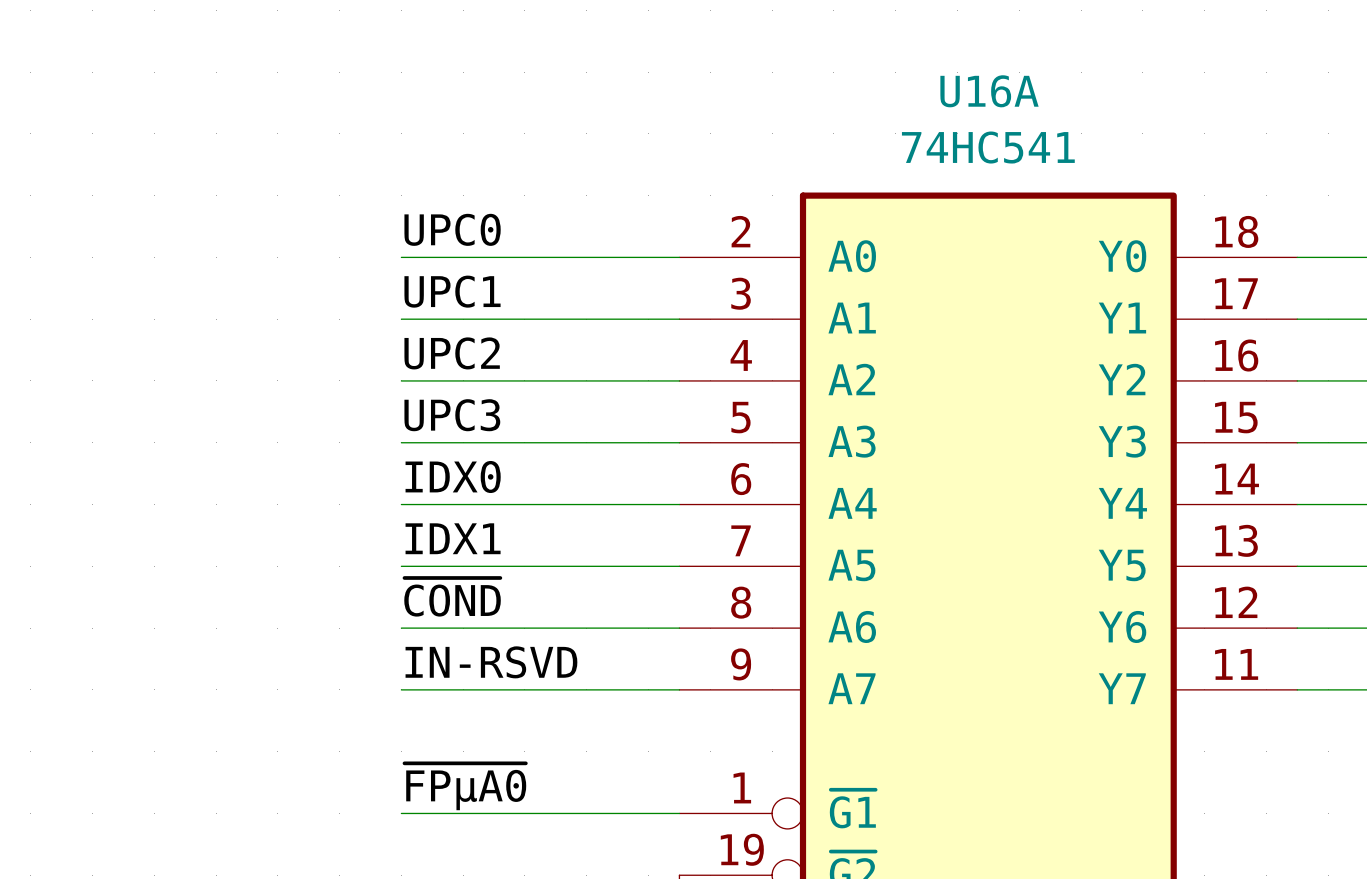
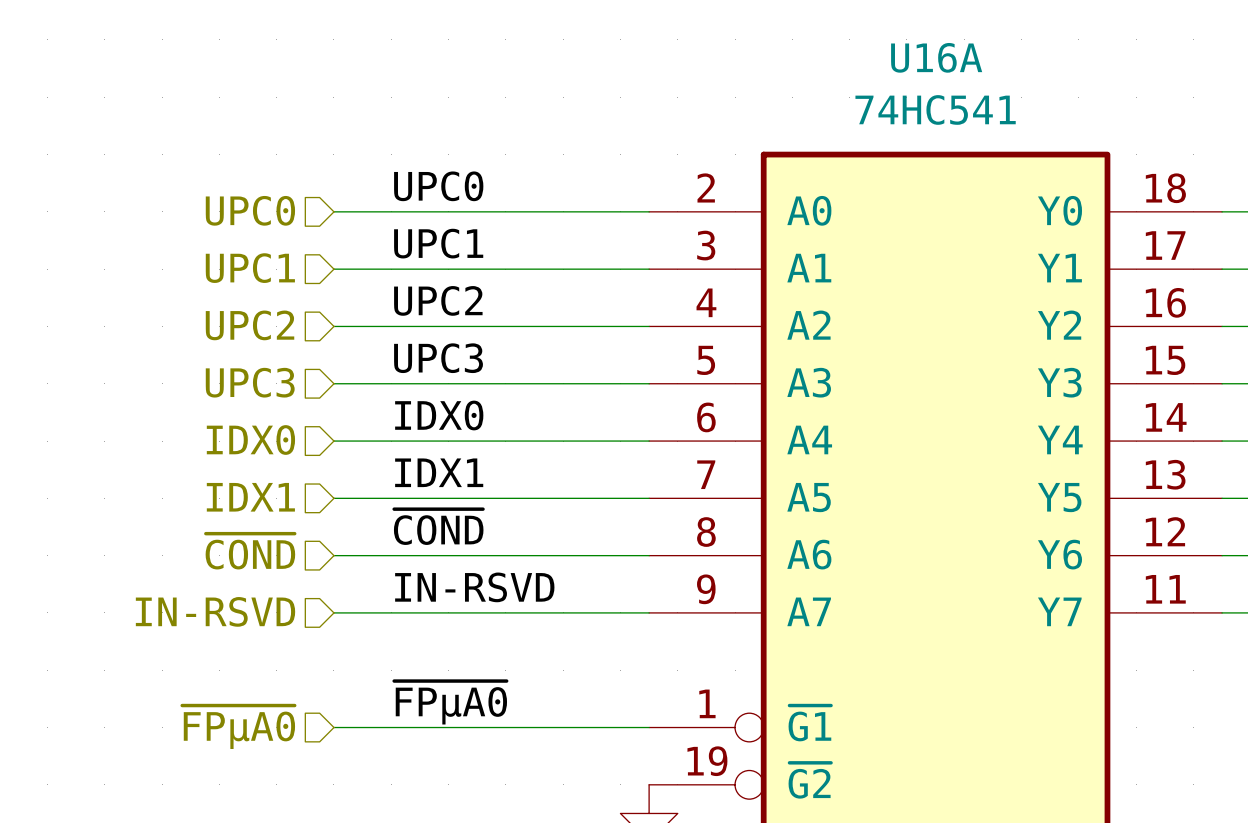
hierarchical label: none -> UPC0 (250, 210)
wire: none -> (333, 211) (391, 211)
hierarchical label: none -> UPC1 (250, 268)
wire: none -> (333, 269) (391, 269)
hierarchical label: none -> UPC2 (250, 325)
wire: none -> (333, 326) (391, 326)
hierarchical label: none -> UPC3 (250, 382)
wire: none -> (333, 383) (391, 383)
hierarchical label: none -> IDX0 (250, 439)
wire: none -> (333, 441) (391, 441)
hierarchical label: none -> IDX1 (250, 497)
wire: none -> (333, 498) (391, 498)
hierarchical label: none -> ~{COND} (250, 551)
wire: none -> (333, 555) (391, 555)
hierarchical label: none -> IN-RSVD (215, 611)
wire: none -> (333, 612) (391, 612)
hierarchical label: none -> ~{FPµA0} (238, 727)
wire: none -> (333, 727) (391, 727)

